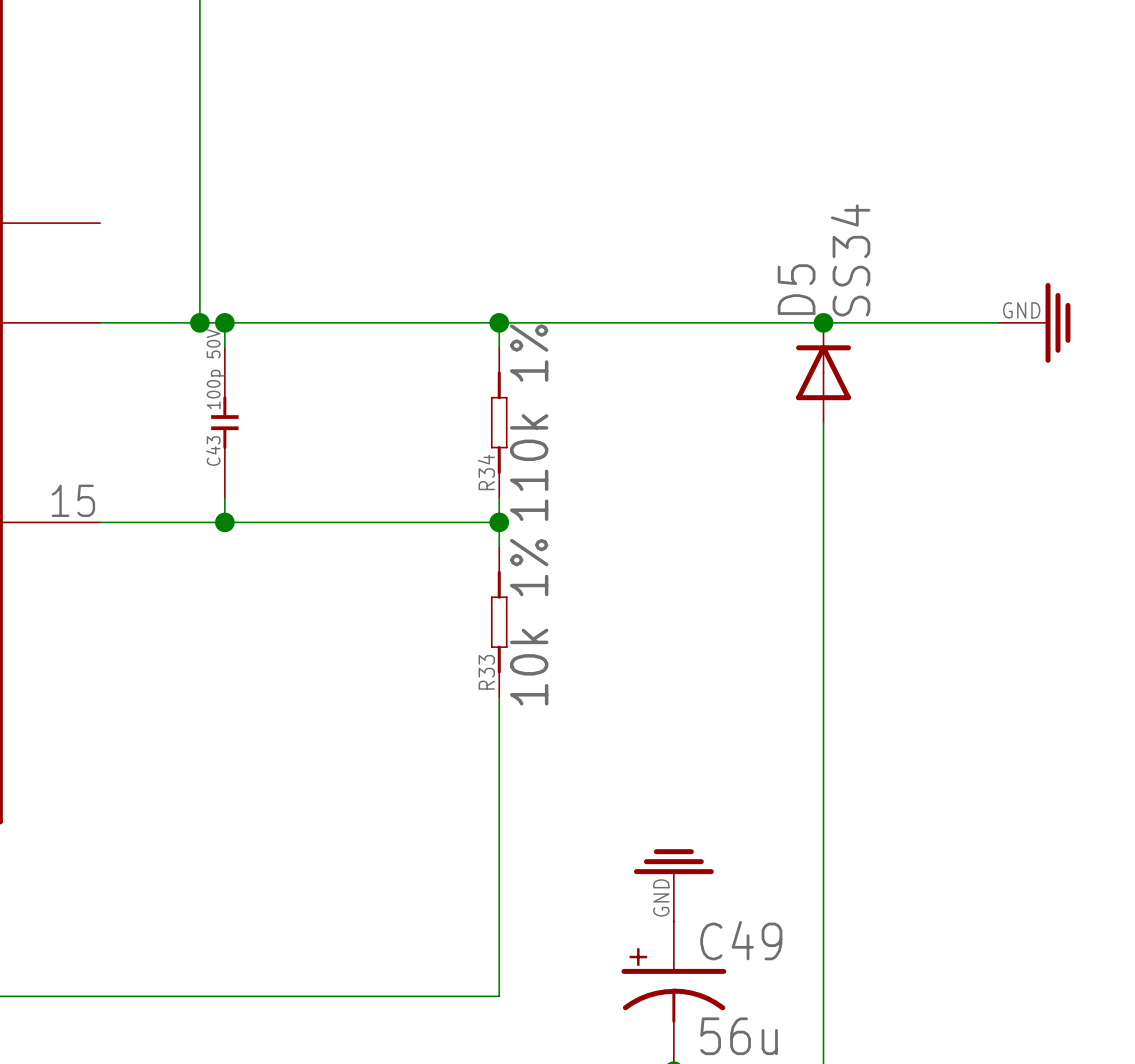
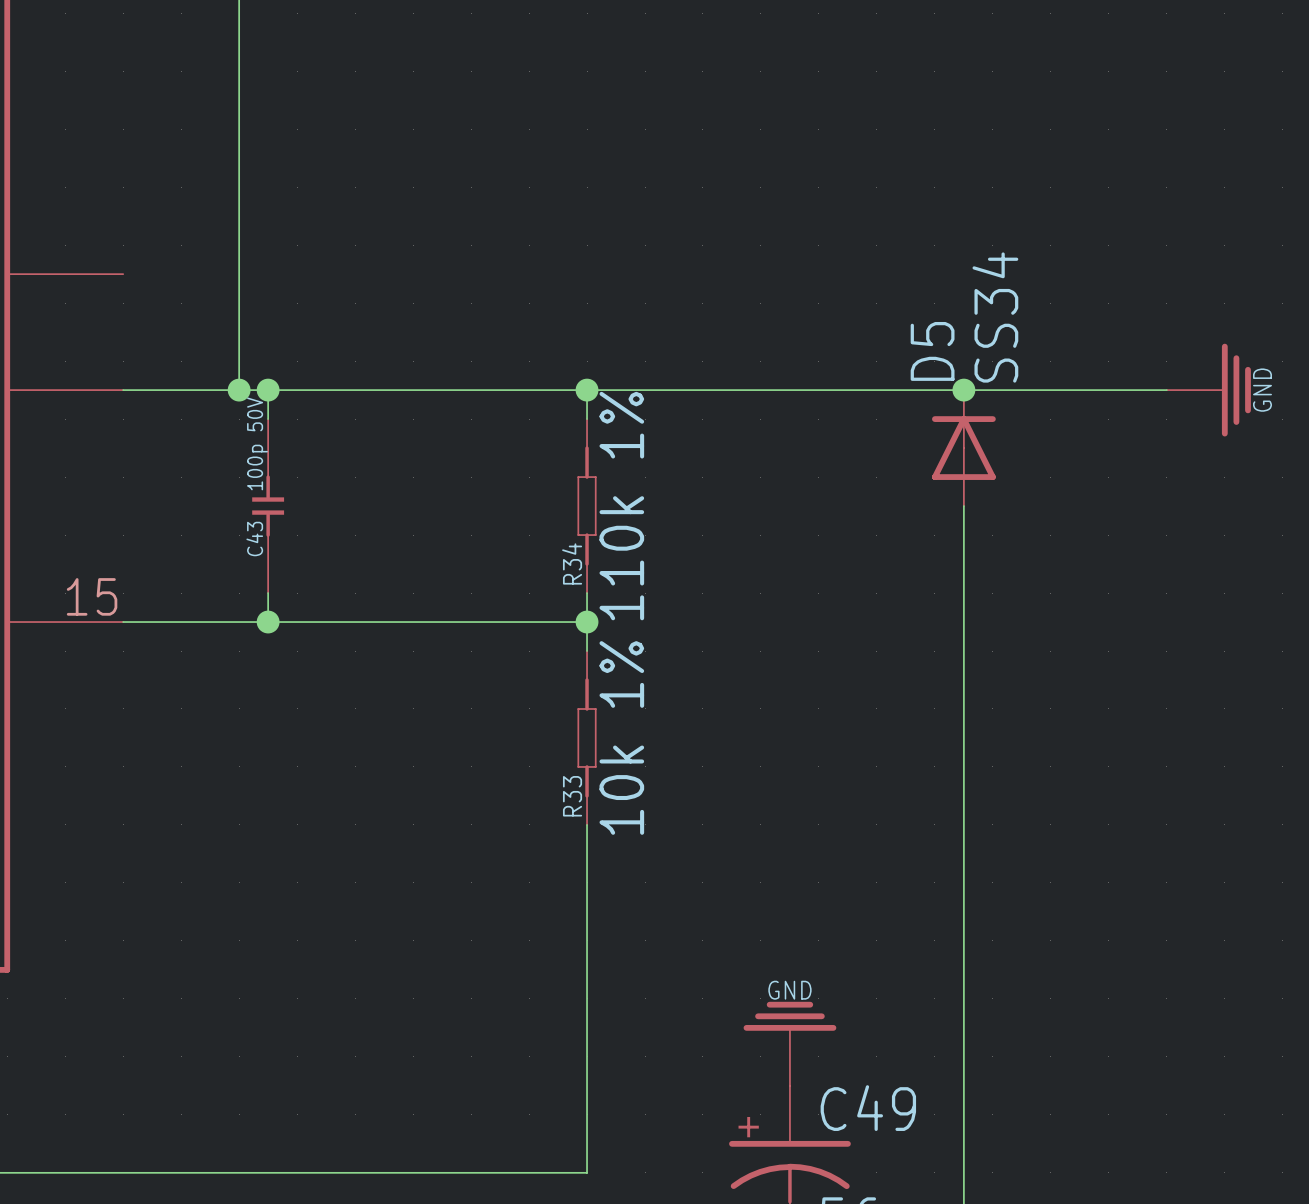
power symbol text rotation: 0° (1021, 310) -> 90° counterclockwise (1262, 390)
power symbol text position: GND (1021, 310) -> GND (1262, 390)
power symbol text rotation: 0° (661, 897) -> 90° clockwise (789, 990)
power symbol text position: GND (661, 897) -> GND (789, 990)

